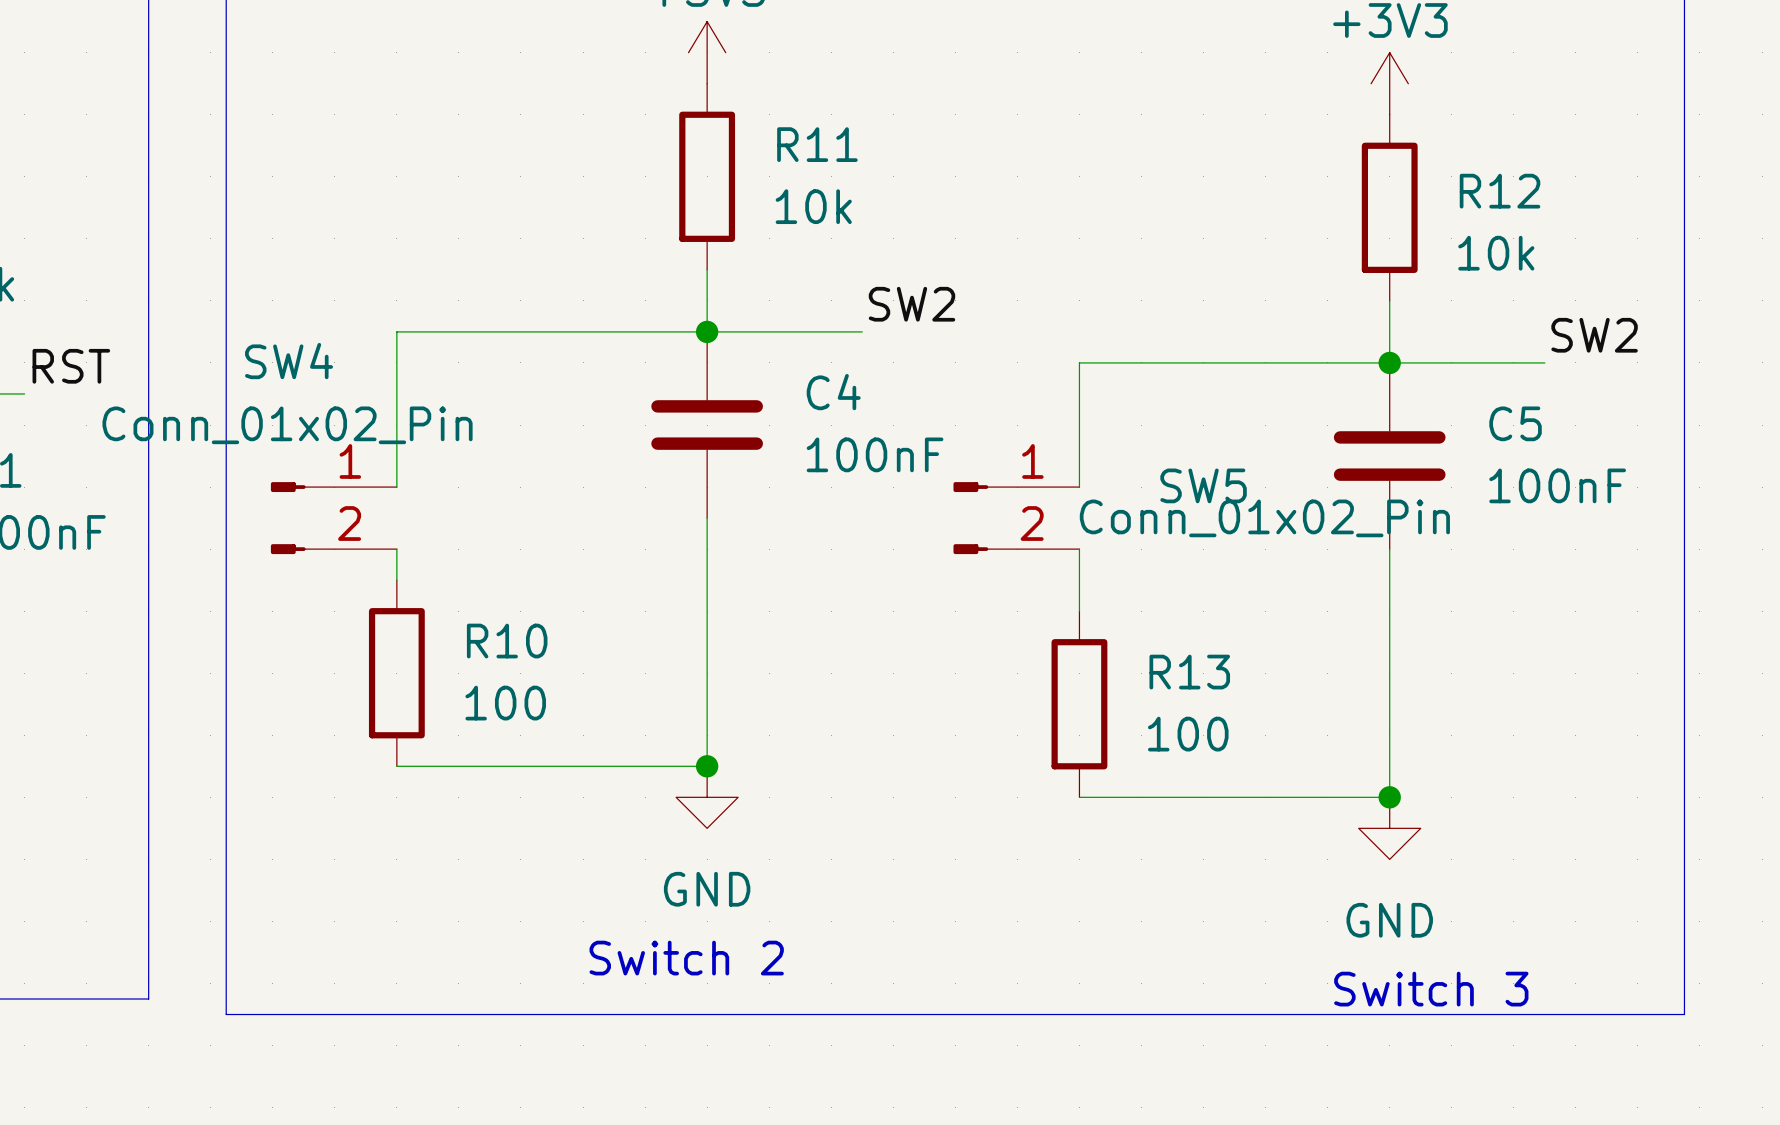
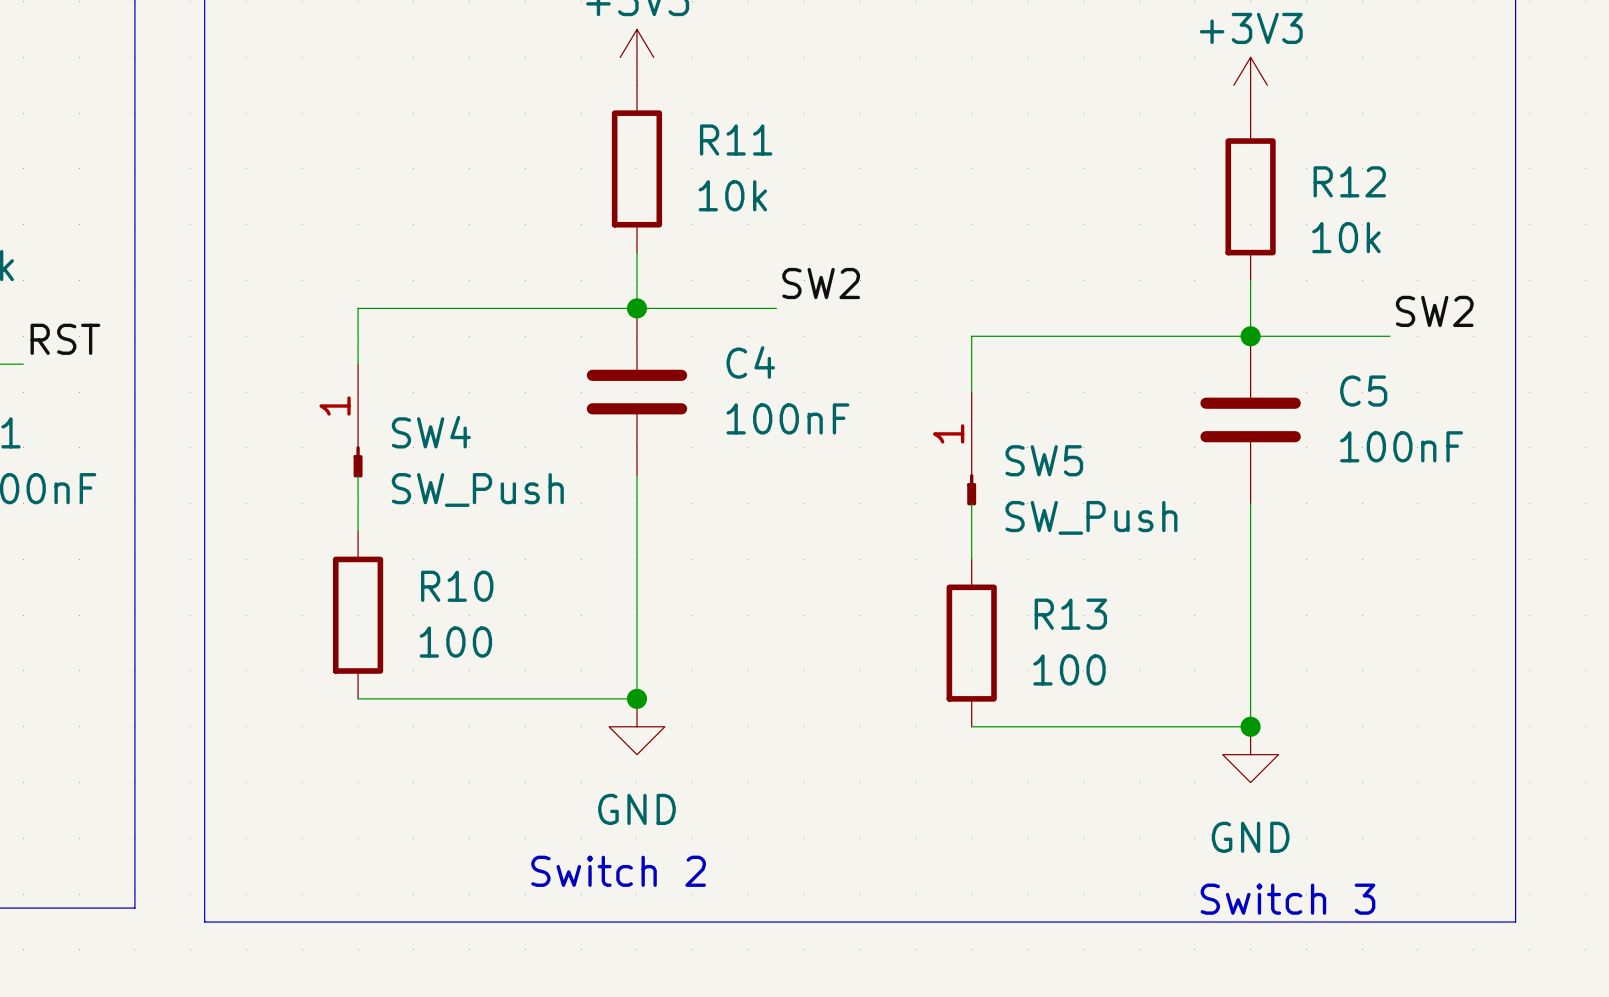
SW4 name position: SW4 (289, 361) -> SW4 (431, 432)
SW4 value: Conn_01x02_Pin (287, 425) -> SW_Push (477, 489)
SW4 symbol: [270, 482, 397, 555] -> [353, 364, 363, 478]
SW5 symbol: [953, 482, 1080, 555] -> [967, 392, 977, 506]
SW5 name position: SW5 (1203, 485) -> SW5 (1044, 460)
wire: none -> (358, 475) (358, 503)
SW5 value: Conn_01x02_Pin (1264, 518) -> SW_Push (1091, 517)

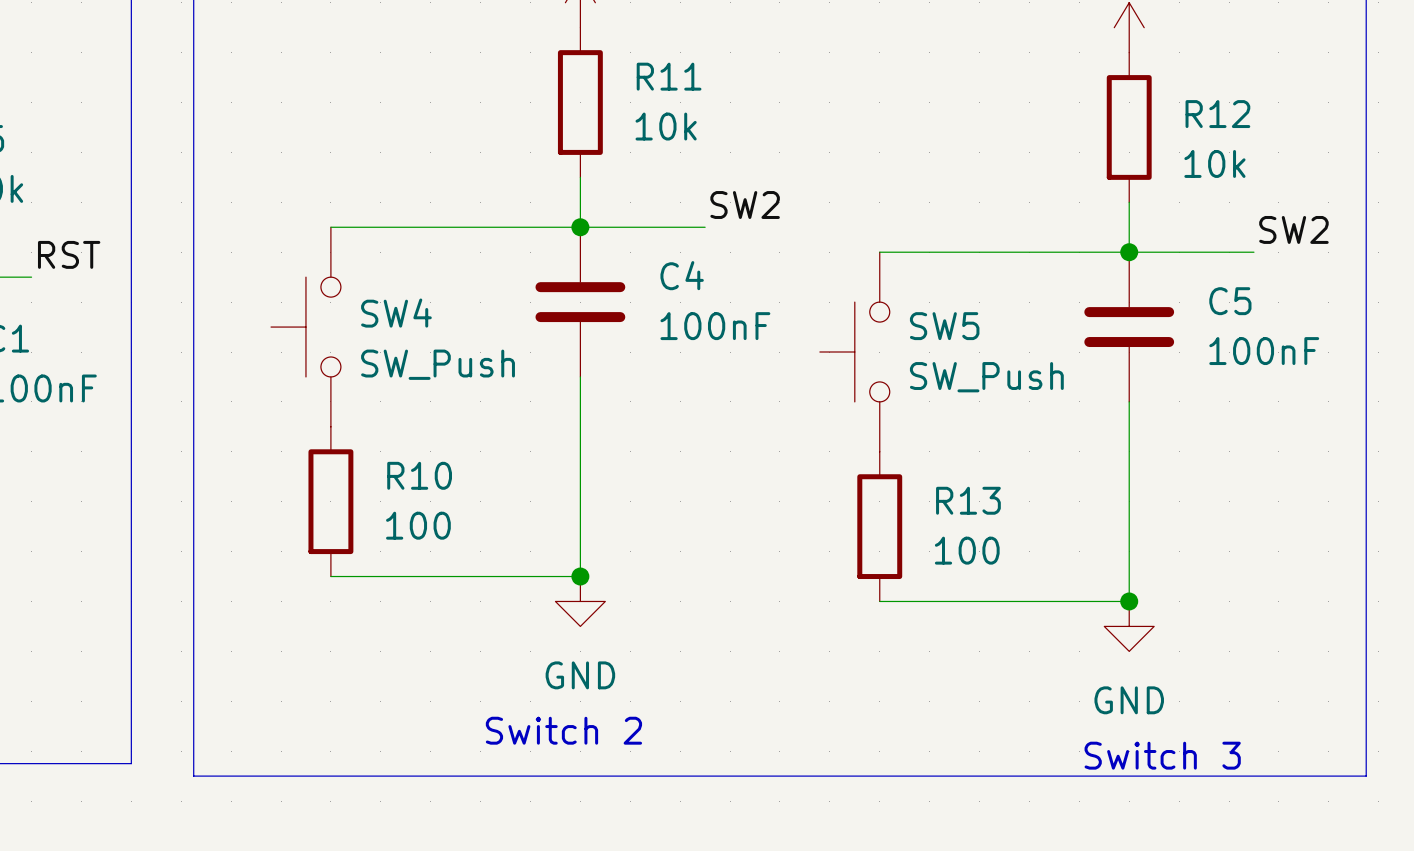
SW4 symbol: [353, 364, 363, 478] -> [271, 227, 341, 427]
SW5 symbol: [967, 392, 977, 506] -> [819, 252, 890, 452]
SW5 name position: SW5 (1044, 460) -> SW5 (944, 326)
SW5 value position: SW_Push (1091, 517) -> SW_Push (986, 377)

